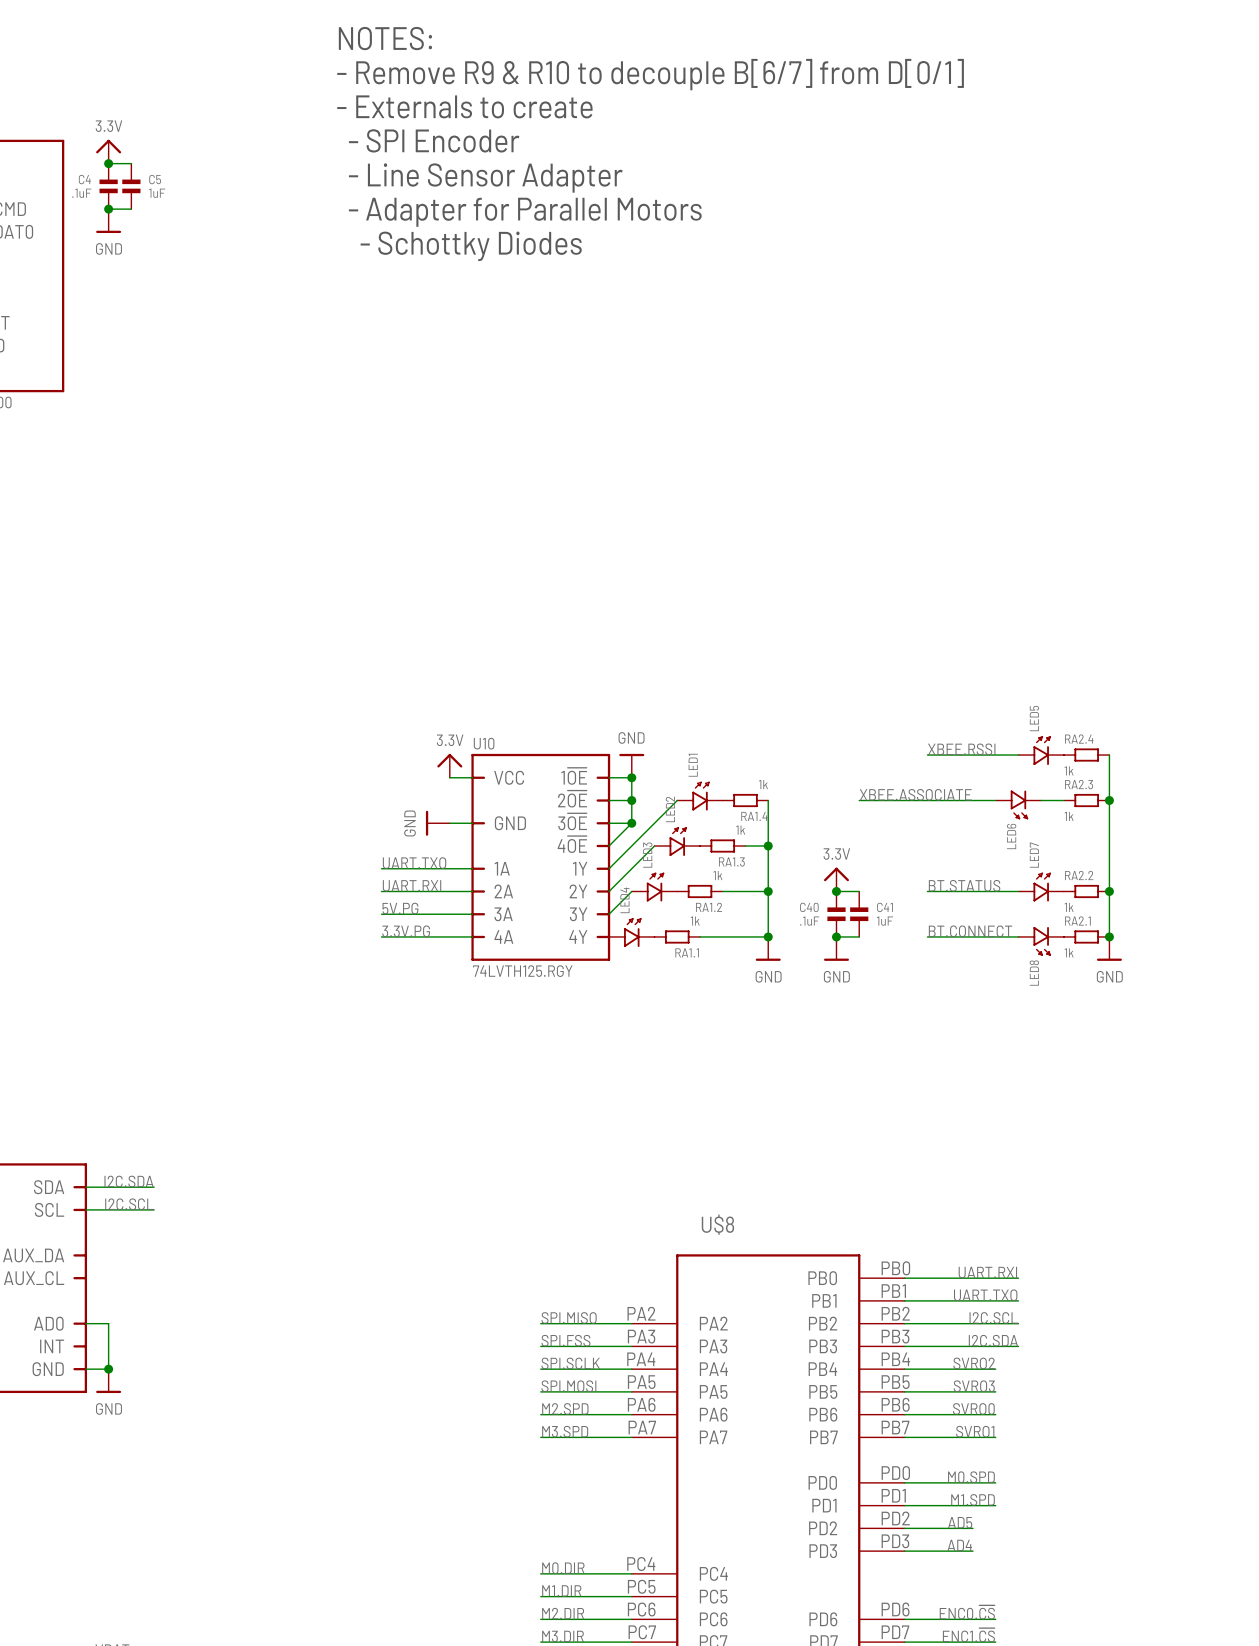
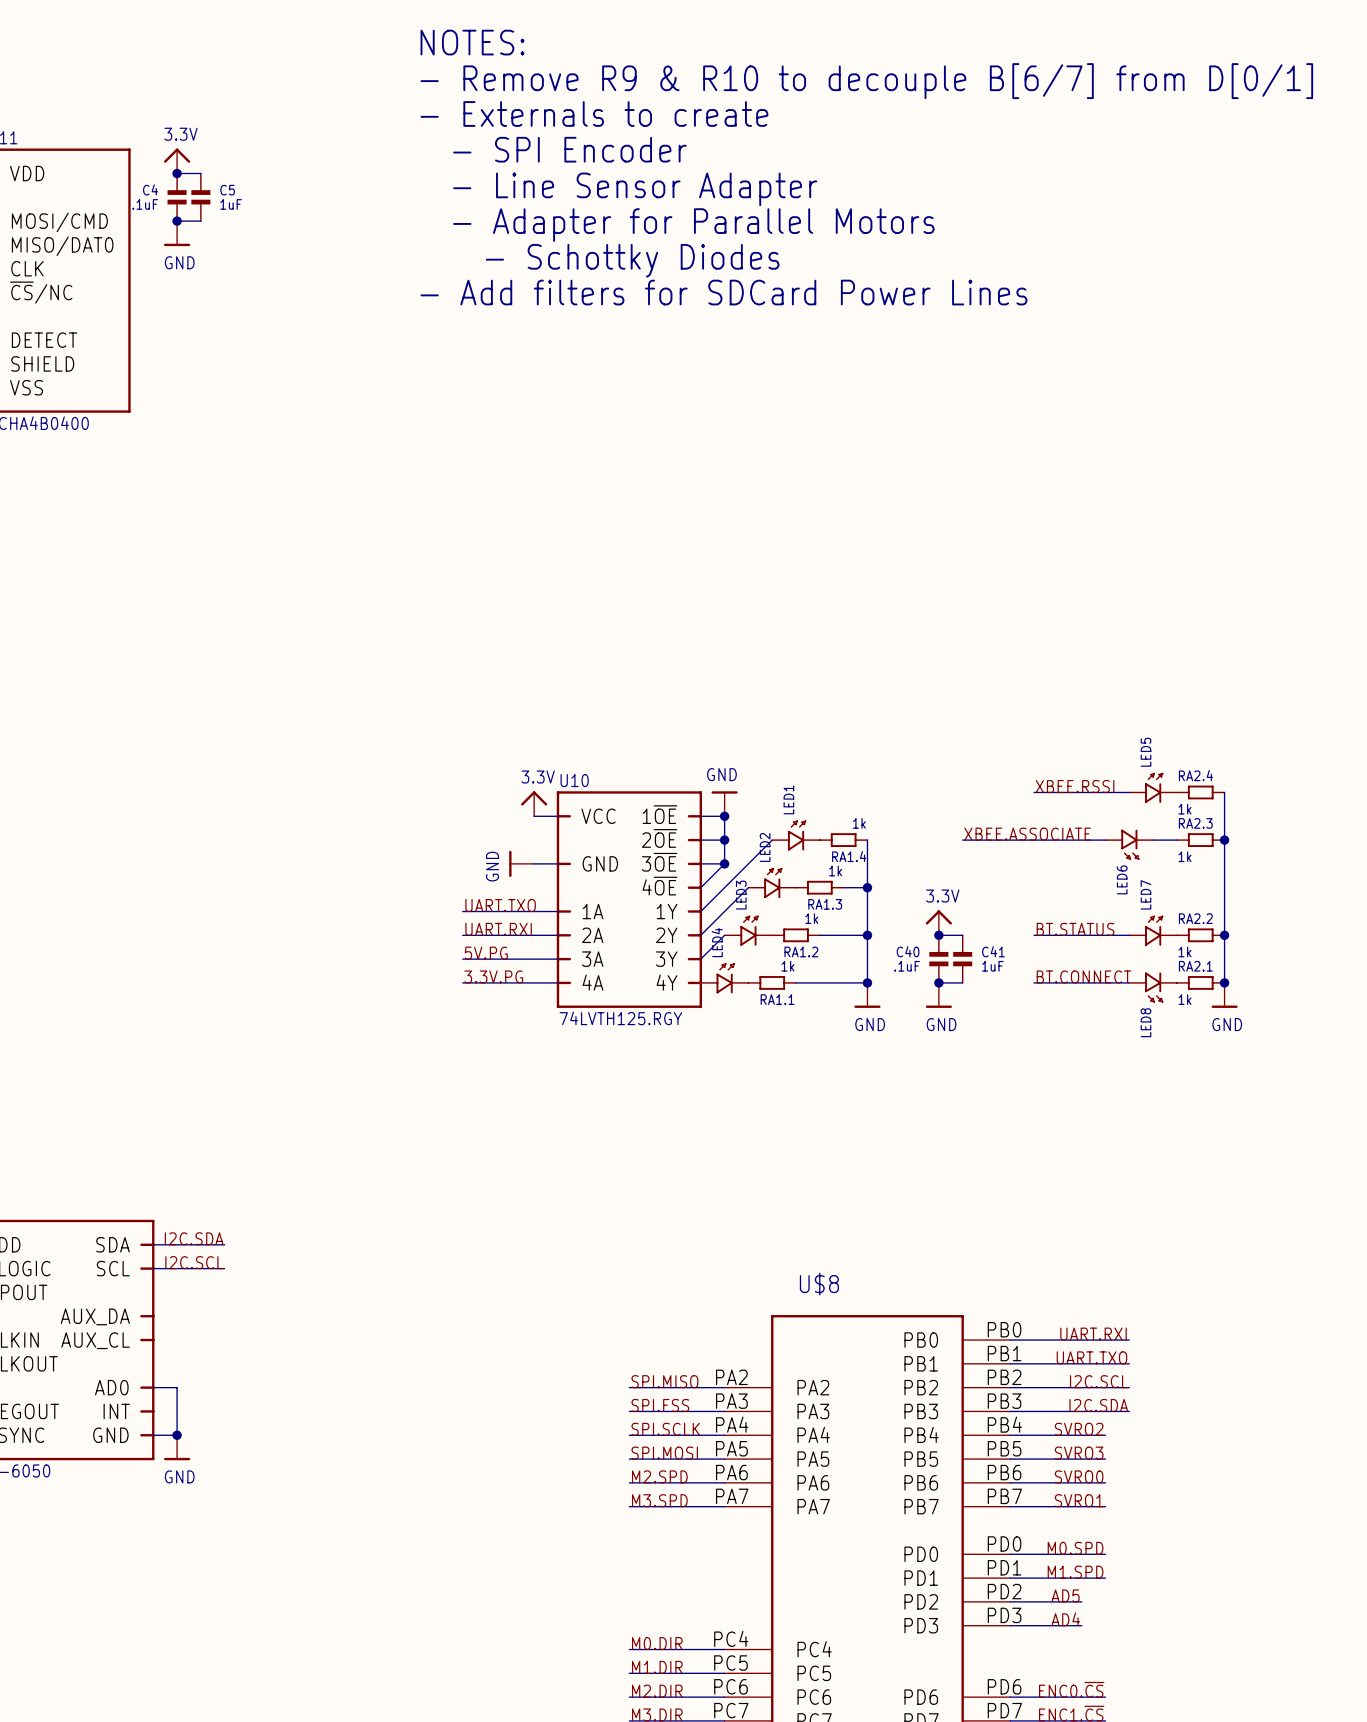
text: none -> - Add filters for SDCard Power Lines (724, 292)

